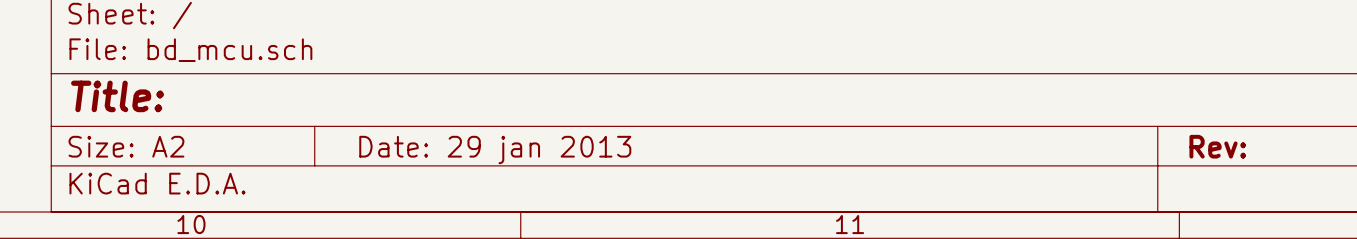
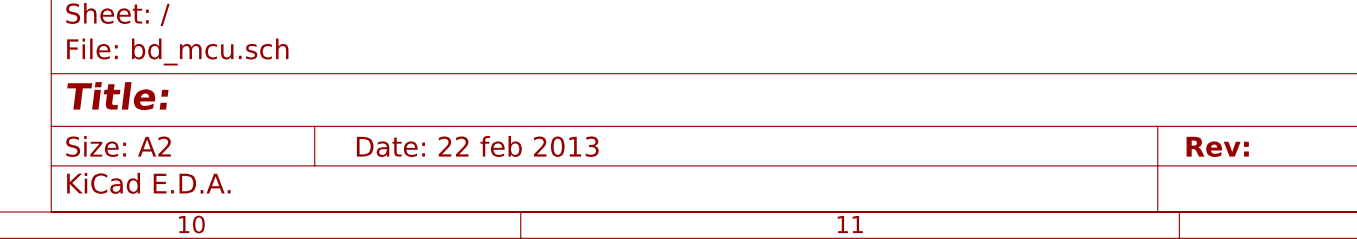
title block: Date: 29 jan 2013 (495, 150) -> Date: 22 feb 2013 (477, 146)

